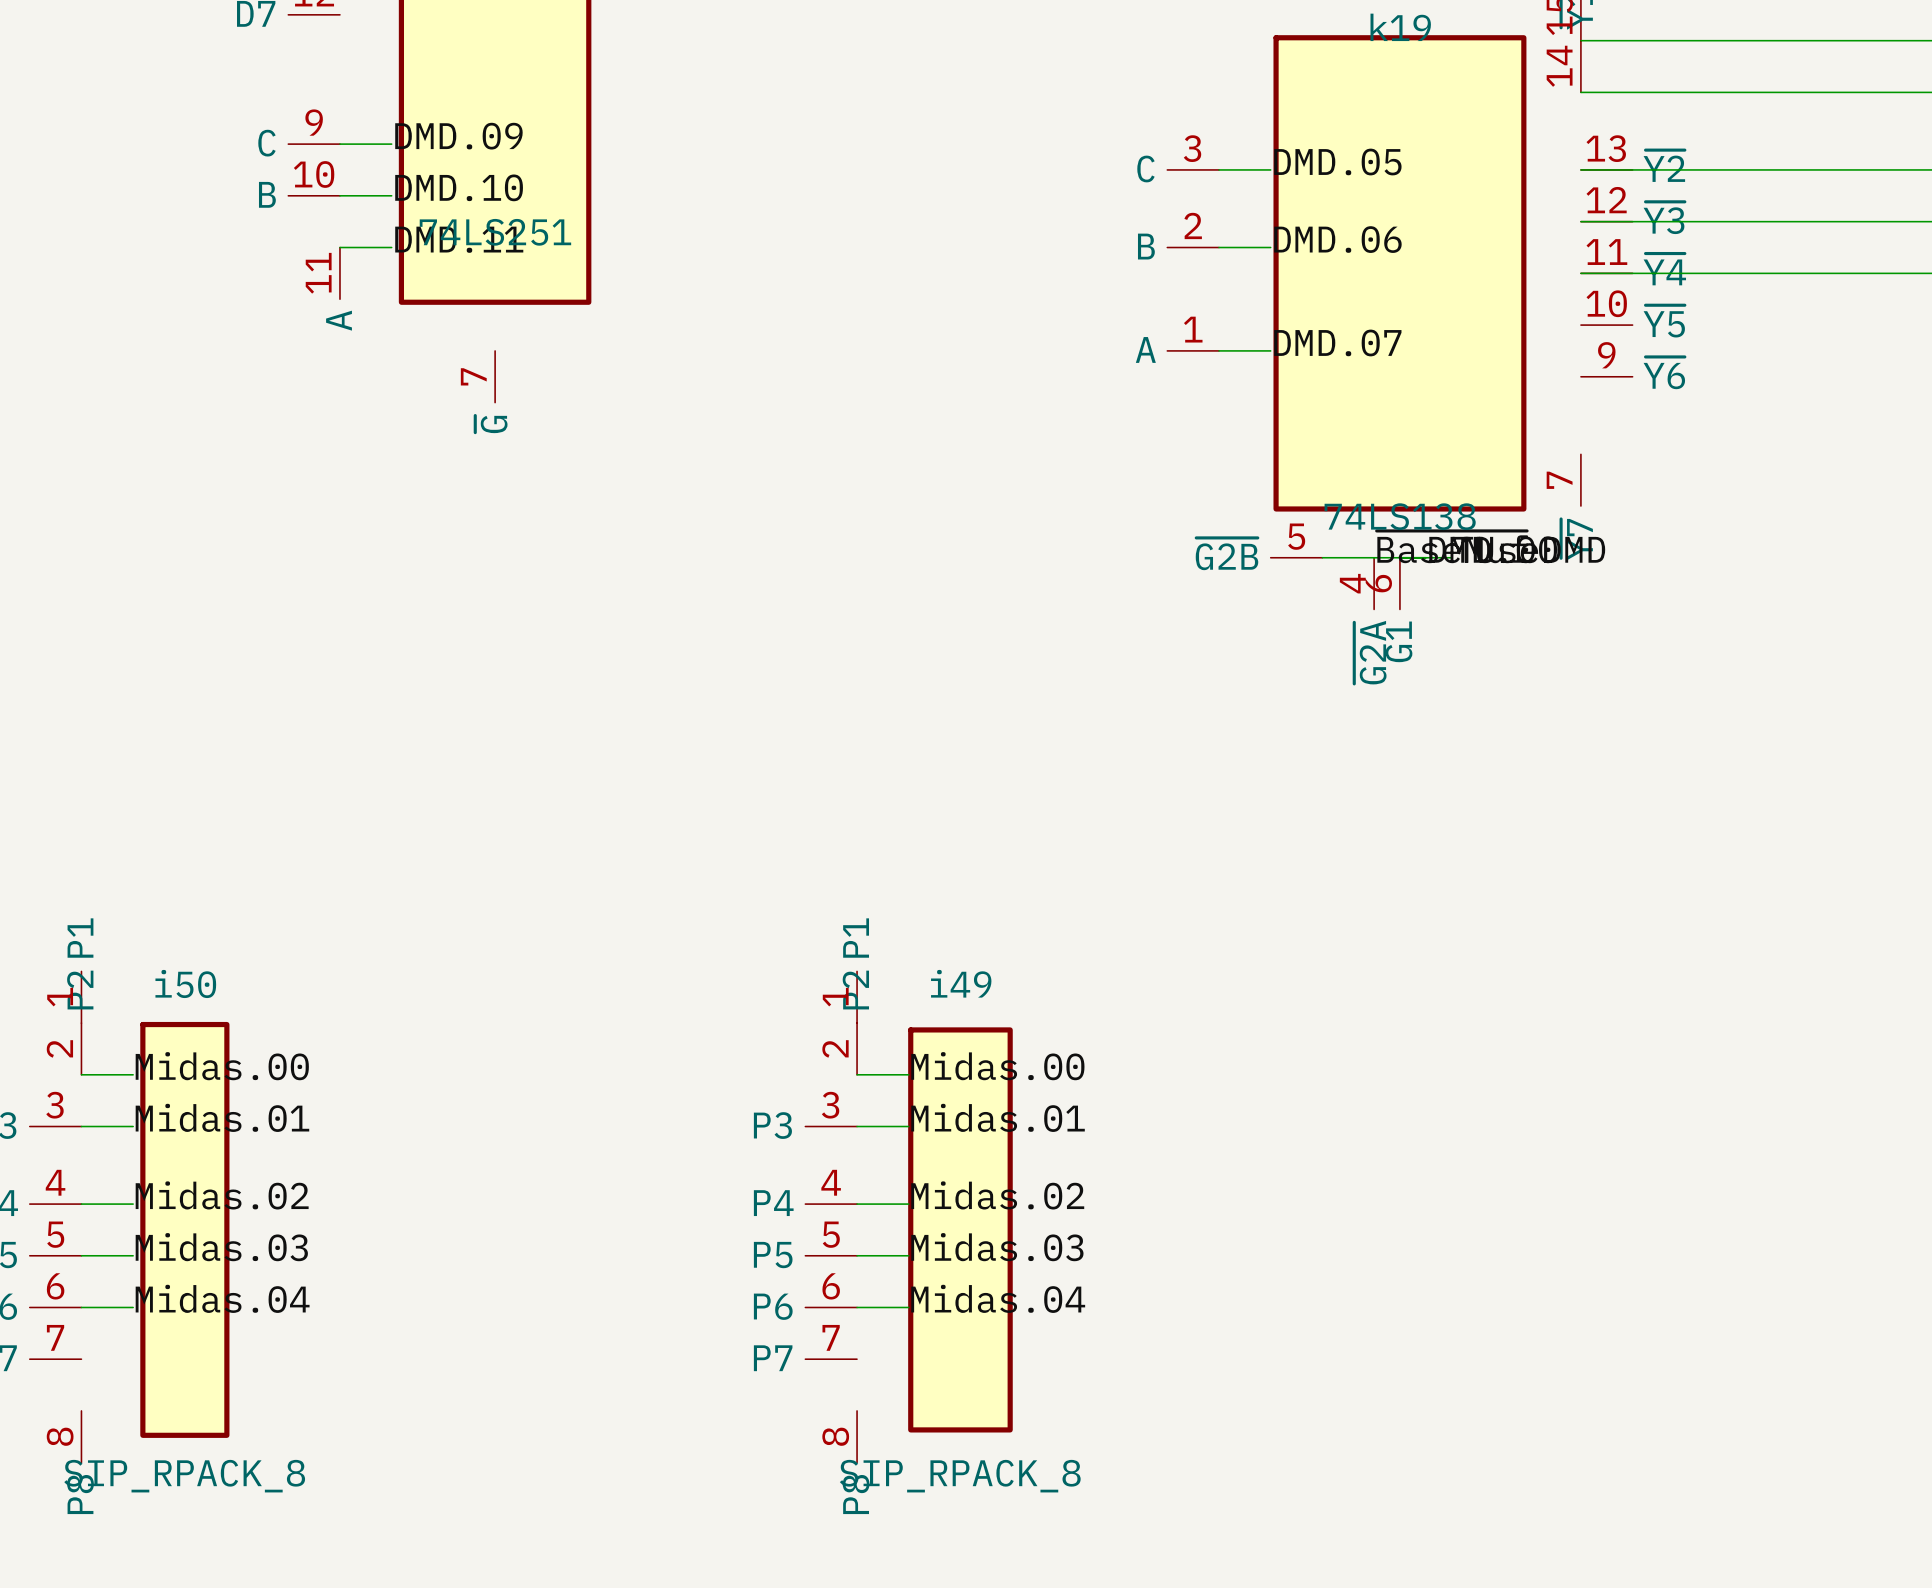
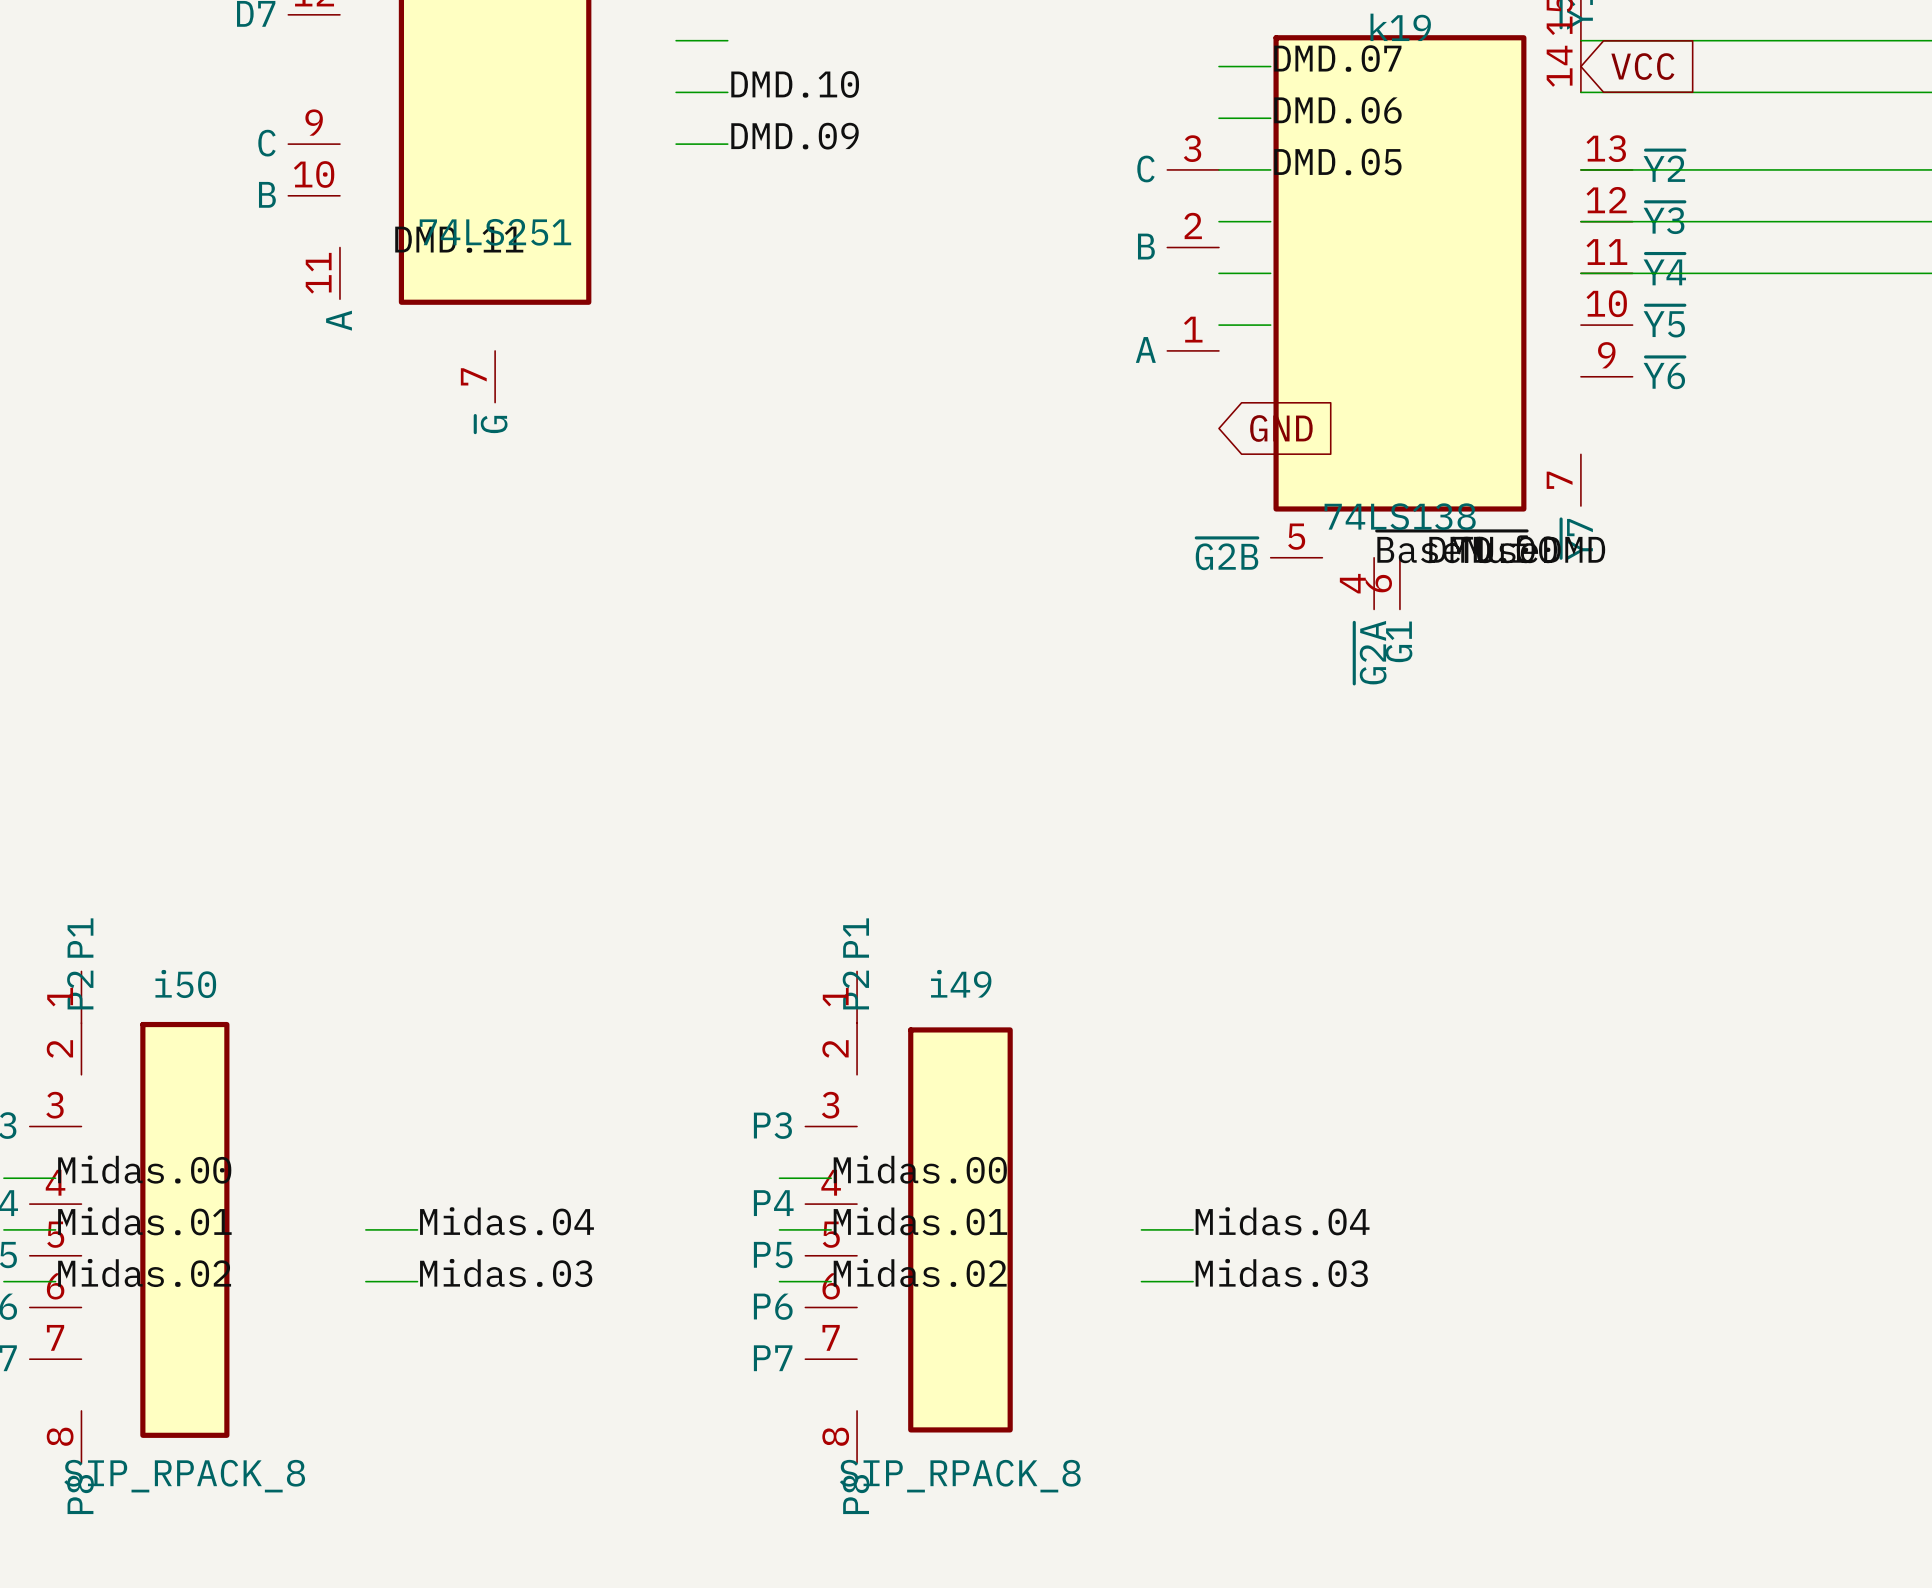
wire: none -> (1218, 66) (1270, 66)
global label: none -> VCC (1642, 66)
wire: none -> (1218, 118) (1270, 118)
label position: DMD.09 (458, 136) -> DMD.09 (795, 136)
wire: (339, 144) (391, 144) -> (676, 40) (727, 40)
label position: DMD.10 (459, 187) -> DMD.10 (795, 84)
wire: (339, 195) (391, 195) -> (676, 92) (727, 92)
label position: DMD.06 (1337, 239) -> DMD.06 (1337, 110)
wire: (339, 247) (391, 247) -> (676, 144) (727, 144)
wire: (1218, 247) (1270, 247) -> (1218, 221) (1270, 221)
wire: none -> (1218, 273) (1270, 273)
label position: DMD.07 (1337, 342) -> DMD.07 (1337, 58)
wire: (1218, 350) (1270, 350) -> (1218, 325) (1270, 325)
global label: none -> GND (1281, 428)
wire: (1322, 557) (1451, 557) -> none
label position: Midas.00 (222, 1066) -> Midas.00 (144, 1169)
label position: Midas.00 (997, 1066) -> Midas.00 (920, 1169)
wire: (81, 1074) (133, 1074) -> (365, 1229) (417, 1229)
wire: (857, 1074) (908, 1074) -> (1141, 1229) (1193, 1229)
label position: Midas.01 (222, 1117) -> Midas.01 (144, 1221)
label position: Midas.01 (998, 1117) -> Midas.01 (920, 1221)
wire: (81, 1126) (133, 1126) -> (365, 1281) (417, 1281)
wire: (857, 1126) (908, 1126) -> (1141, 1281) (1193, 1281)
label position: Midas.02 (222, 1195) -> Midas.02 (144, 1272)
label position: Midas.02 (997, 1195) -> Midas.02 (920, 1272)
wire: (81, 1204) (133, 1204) -> (3, 1178) (55, 1178)
wire: (857, 1204) (908, 1204) -> (779, 1178) (831, 1178)
label: none -> Midas.04 (506, 1221)
label: none -> Midas.04 (1282, 1221)
label: Midas.03 (221, 1247) -> none
label: Midas.03 (997, 1247) -> none
wire: (81, 1255) (133, 1255) -> (3, 1229) (55, 1229)
wire: (857, 1255) (908, 1255) -> (779, 1229) (831, 1229)
label: none -> Midas.03 (506, 1272)
label: none -> Midas.03 (1281, 1272)
label: Midas.04 (222, 1298) -> none
label: Midas.04 (998, 1298) -> none
wire: (81, 1307) (133, 1307) -> (3, 1281) (55, 1281)
wire: (857, 1307) (908, 1307) -> (779, 1281) (831, 1281)

